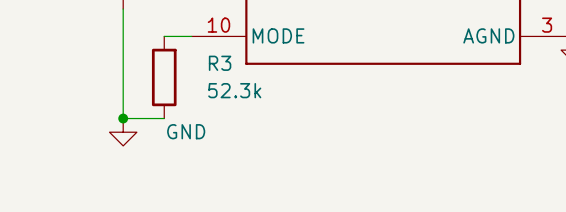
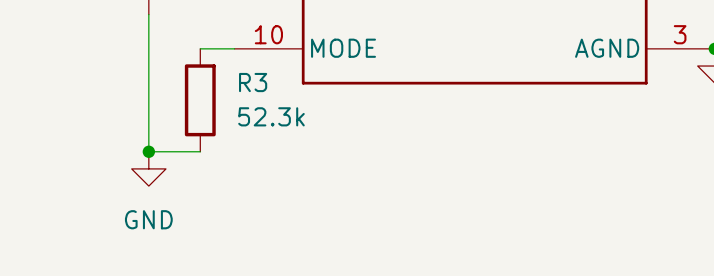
R3 name position: R3 (220, 63) -> R3 (253, 82)
R3 value position: 52.3k (234, 90) -> 52.3k (271, 116)
power symbol text position: GND (186, 131) -> GND (148, 219)

